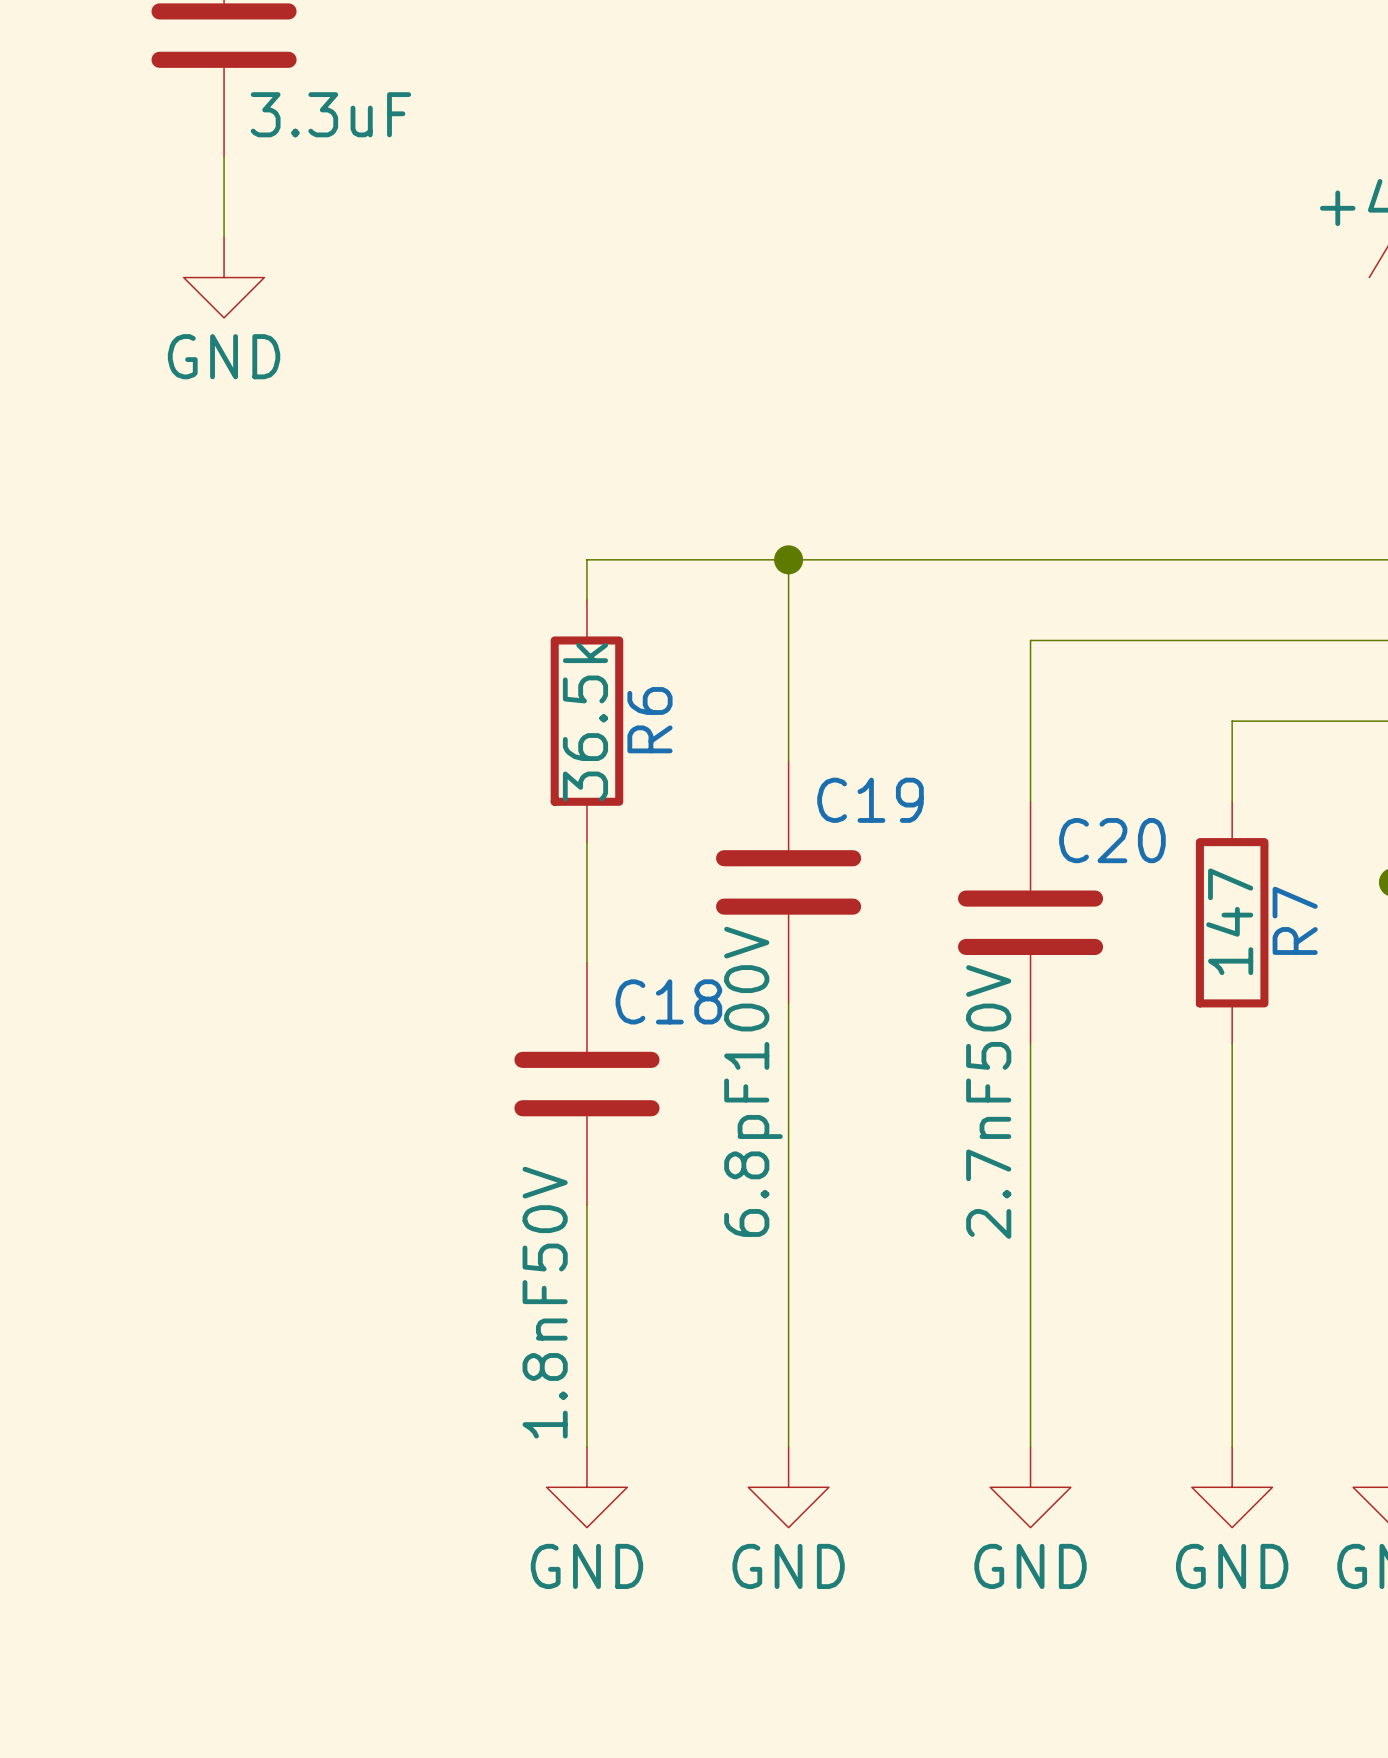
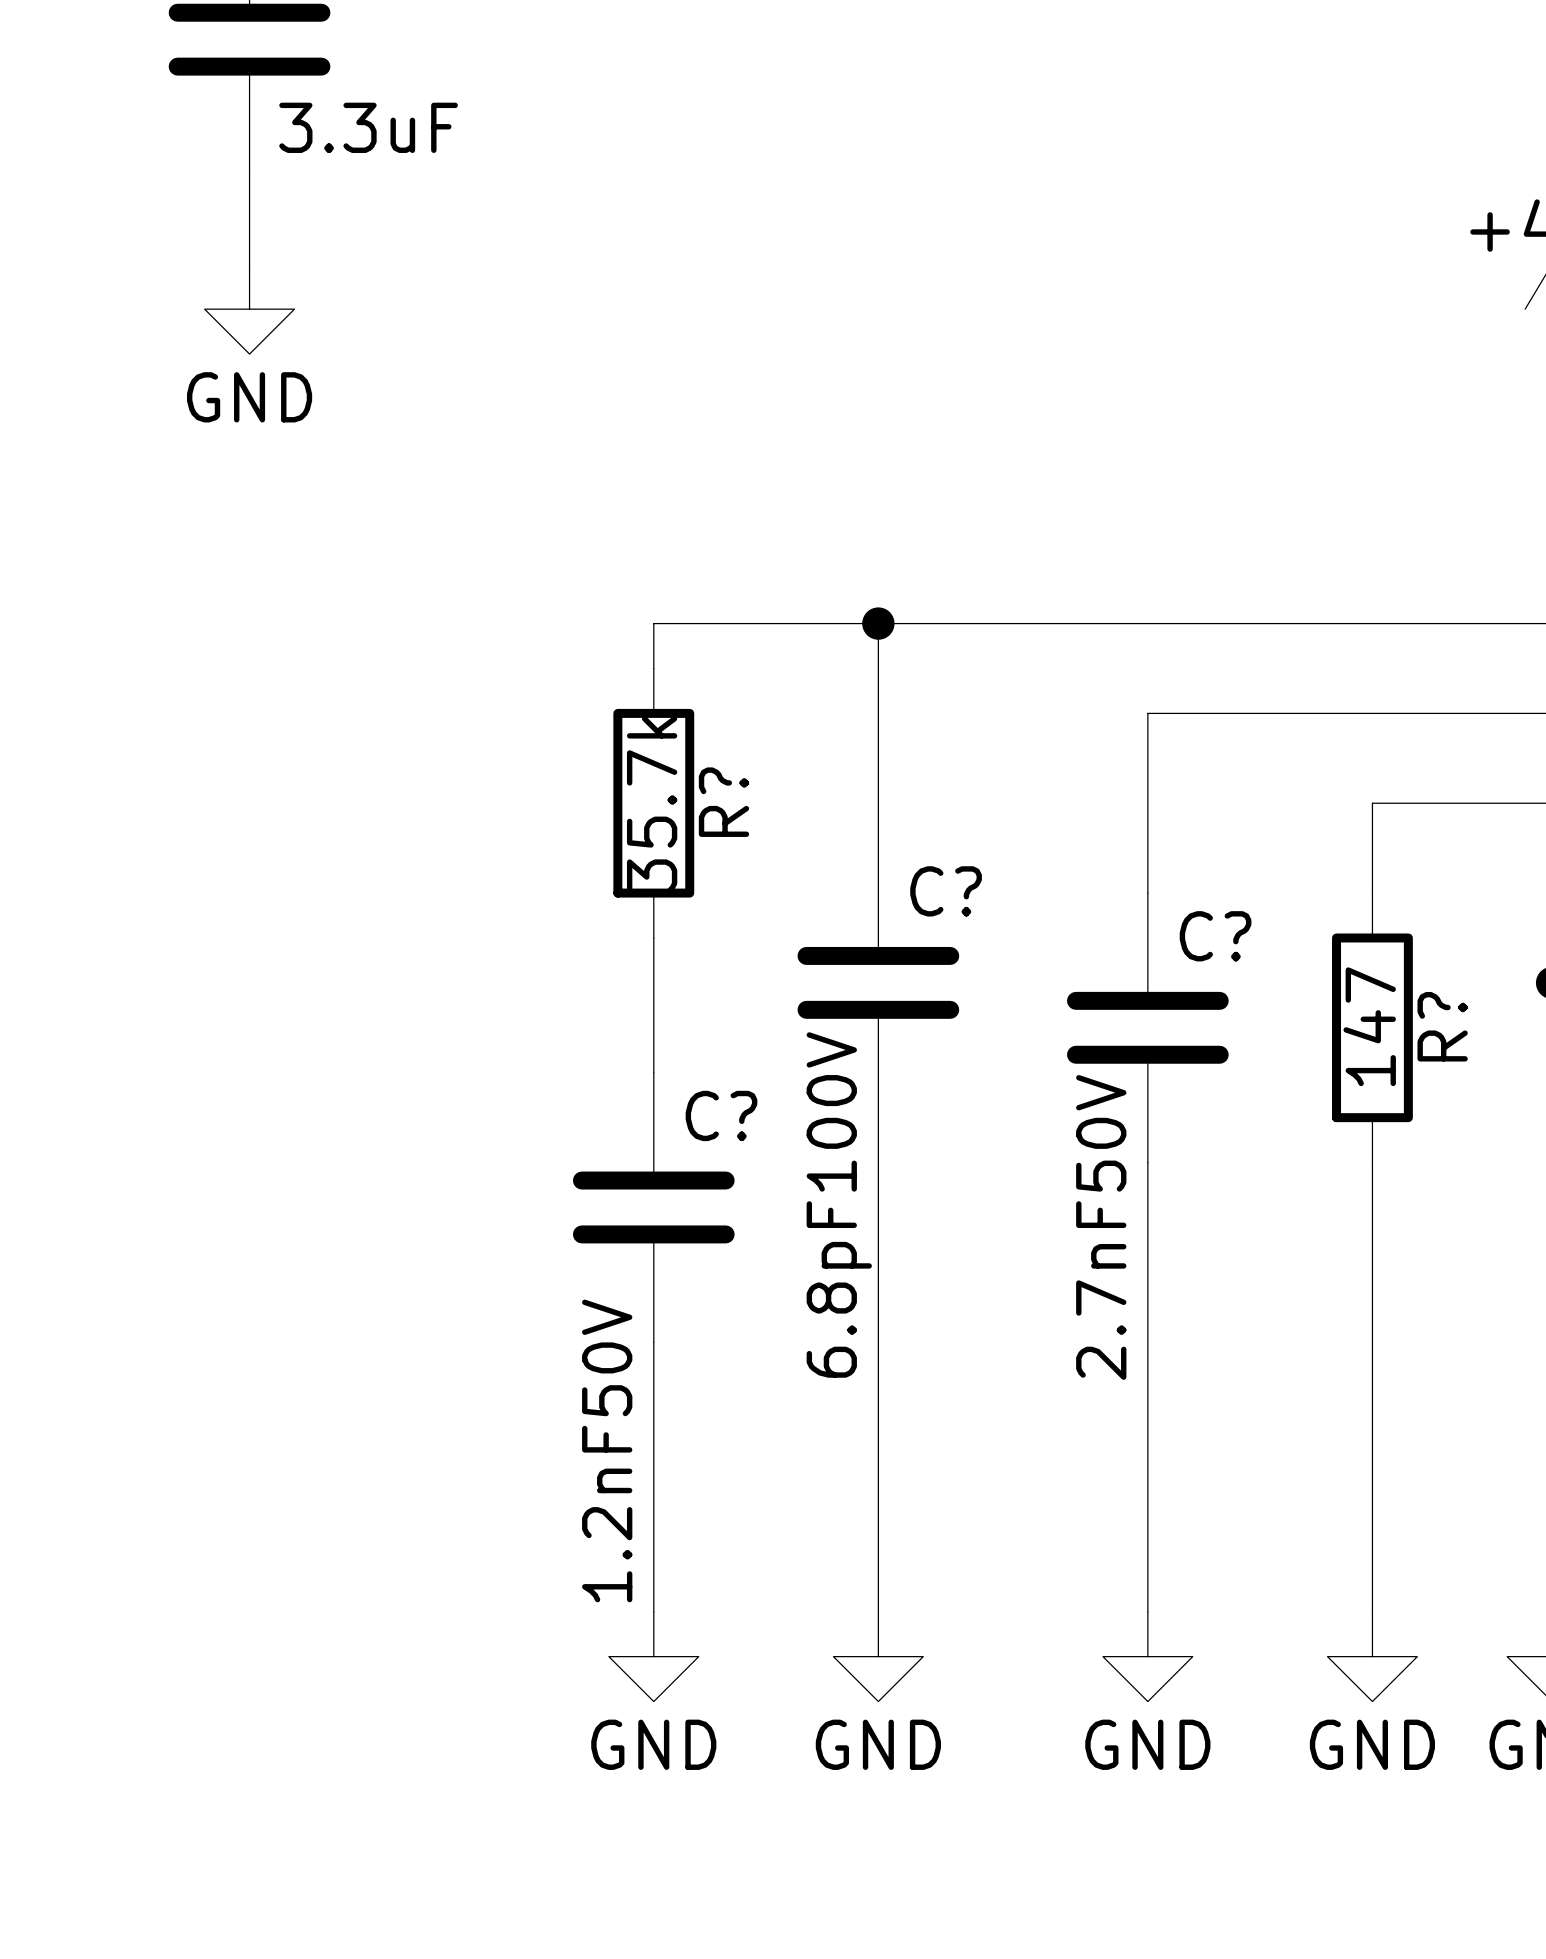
R6 name: R6 (649, 720) -> R? (723, 802)
R6 value: 36.5k (585, 722) -> 35.7k (652, 804)
C19 name: C19 (870, 800) -> C? (946, 891)
C20 name: C20 (1112, 840) -> C? (1215, 936)
R7 name: R7 (1295, 920) -> R? (1442, 1026)
C18 name: C18 (668, 1001) -> C? (721, 1115)
C18 value: 1.8nF50V (545, 1302) -> 1.2nF50V (607, 1450)

